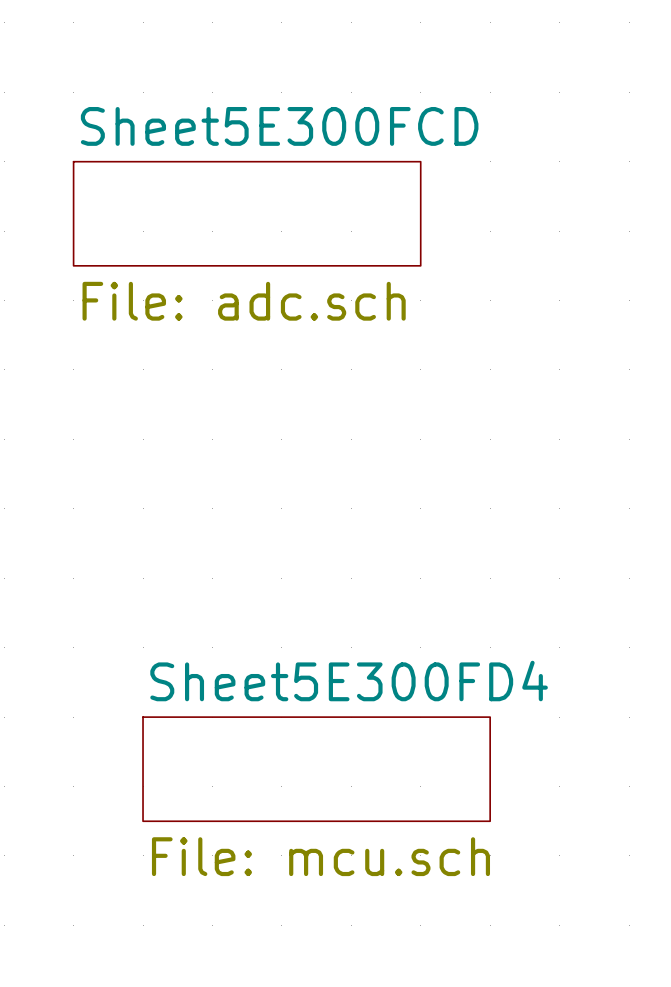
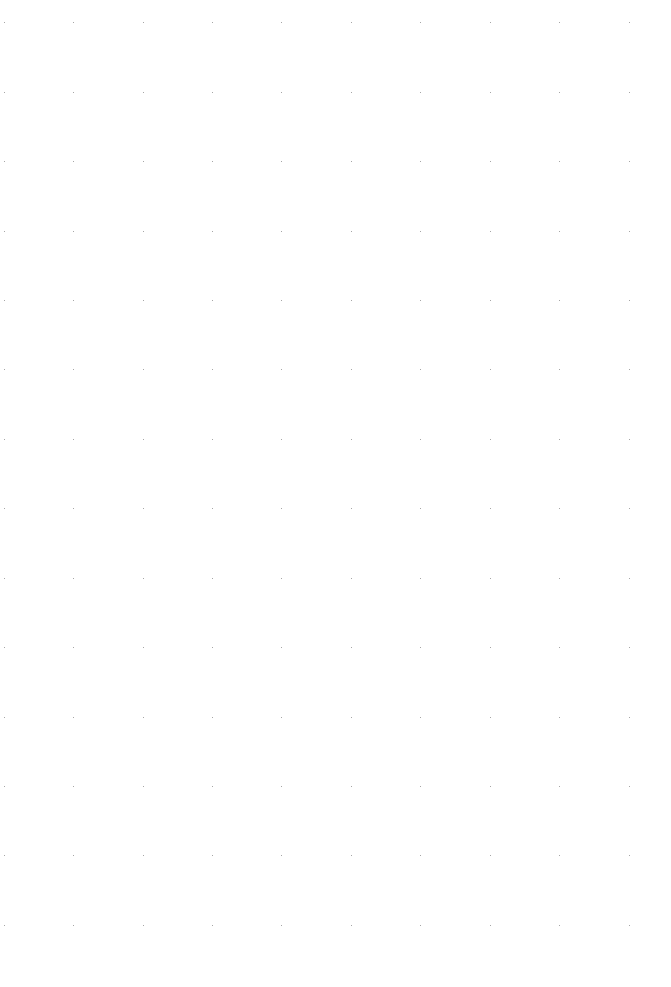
sheet Sheet5E300FCD: File: adc.sch (247, 213) -> none
sheet Sheet5E300FD4: File: mcu.sch (316, 769) -> none

